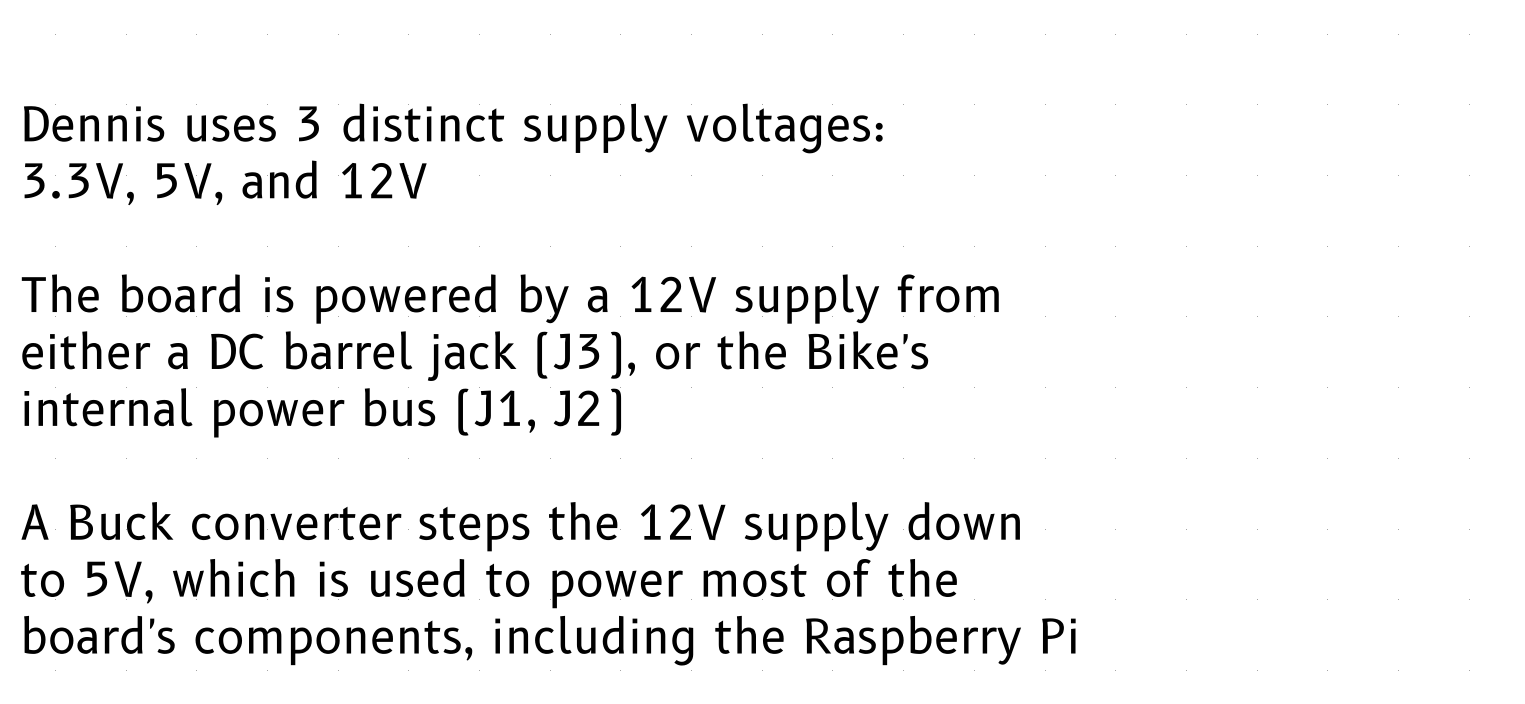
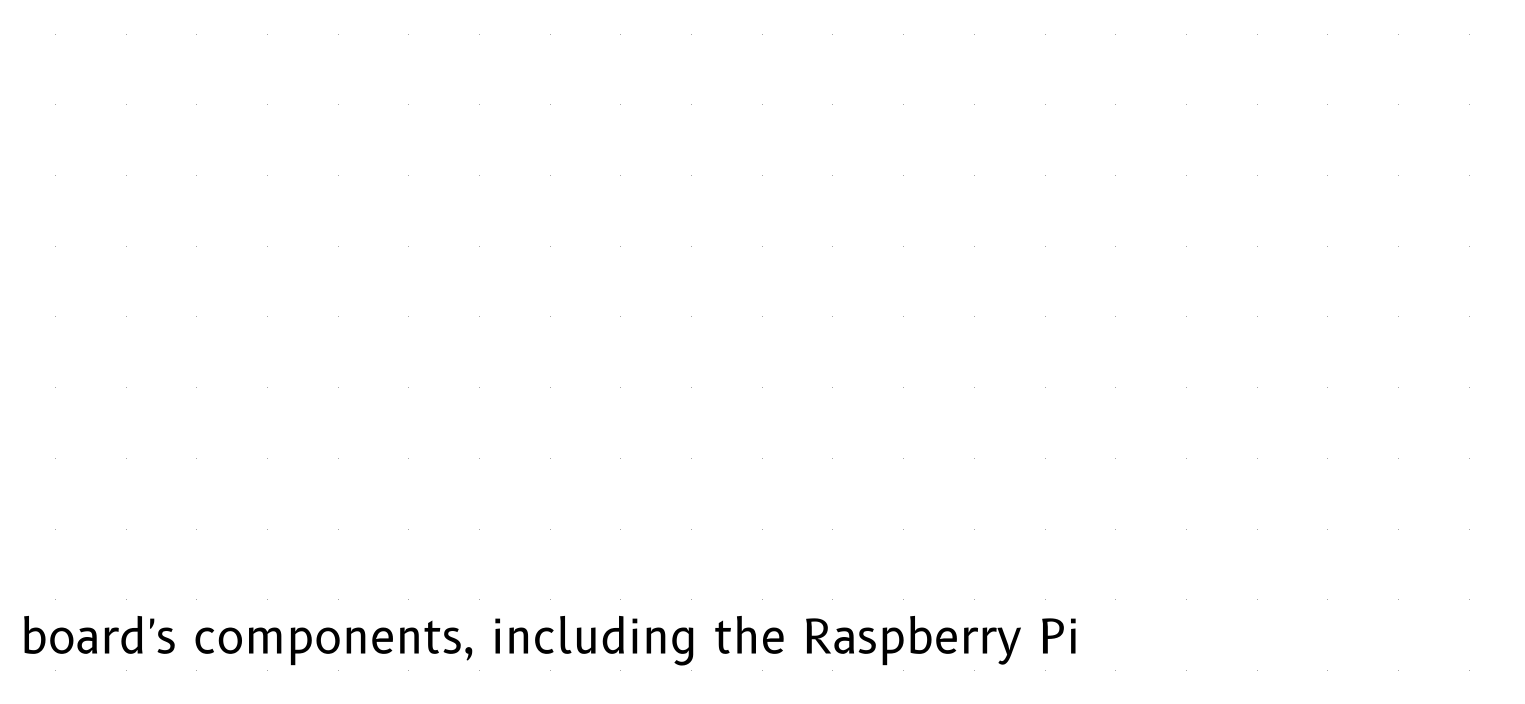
text: Dennis uses 3 distinct supply voltages: (453, 128) -> none
text: 3.3V, 5V, and 12V (225, 182) -> none
text: The board is powered by a 12V supply from (510, 299) -> none
text: either a DC barrel jack (J3), or the Bike's (475, 356) -> none
text: internal power bus (J1, J2) (322, 412) -> none
text: A Buck converter steps the 12V supply down (520, 526) -> none
text: to 5V, which is used to power most of the (489, 583) -> none

